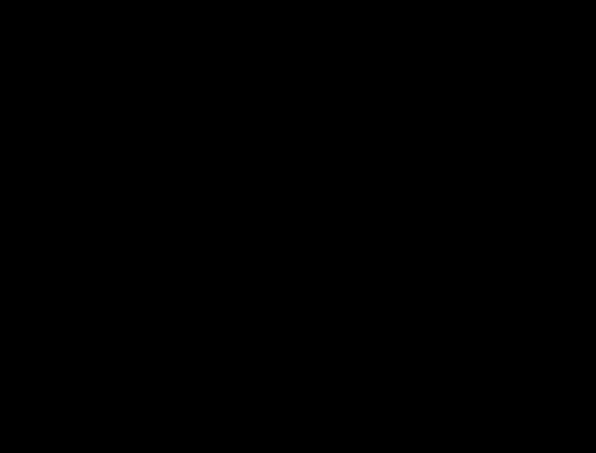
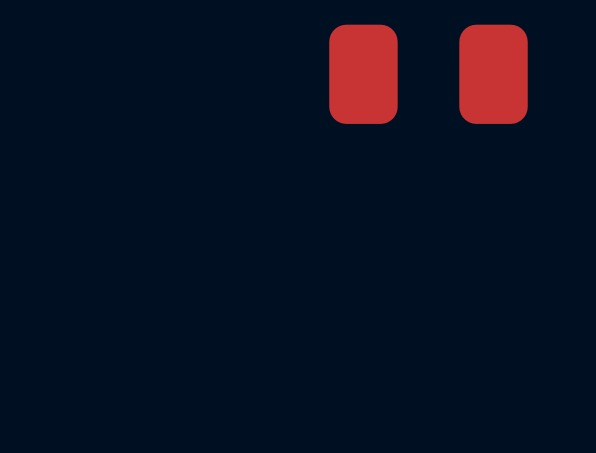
part: none -> (428, 74)

